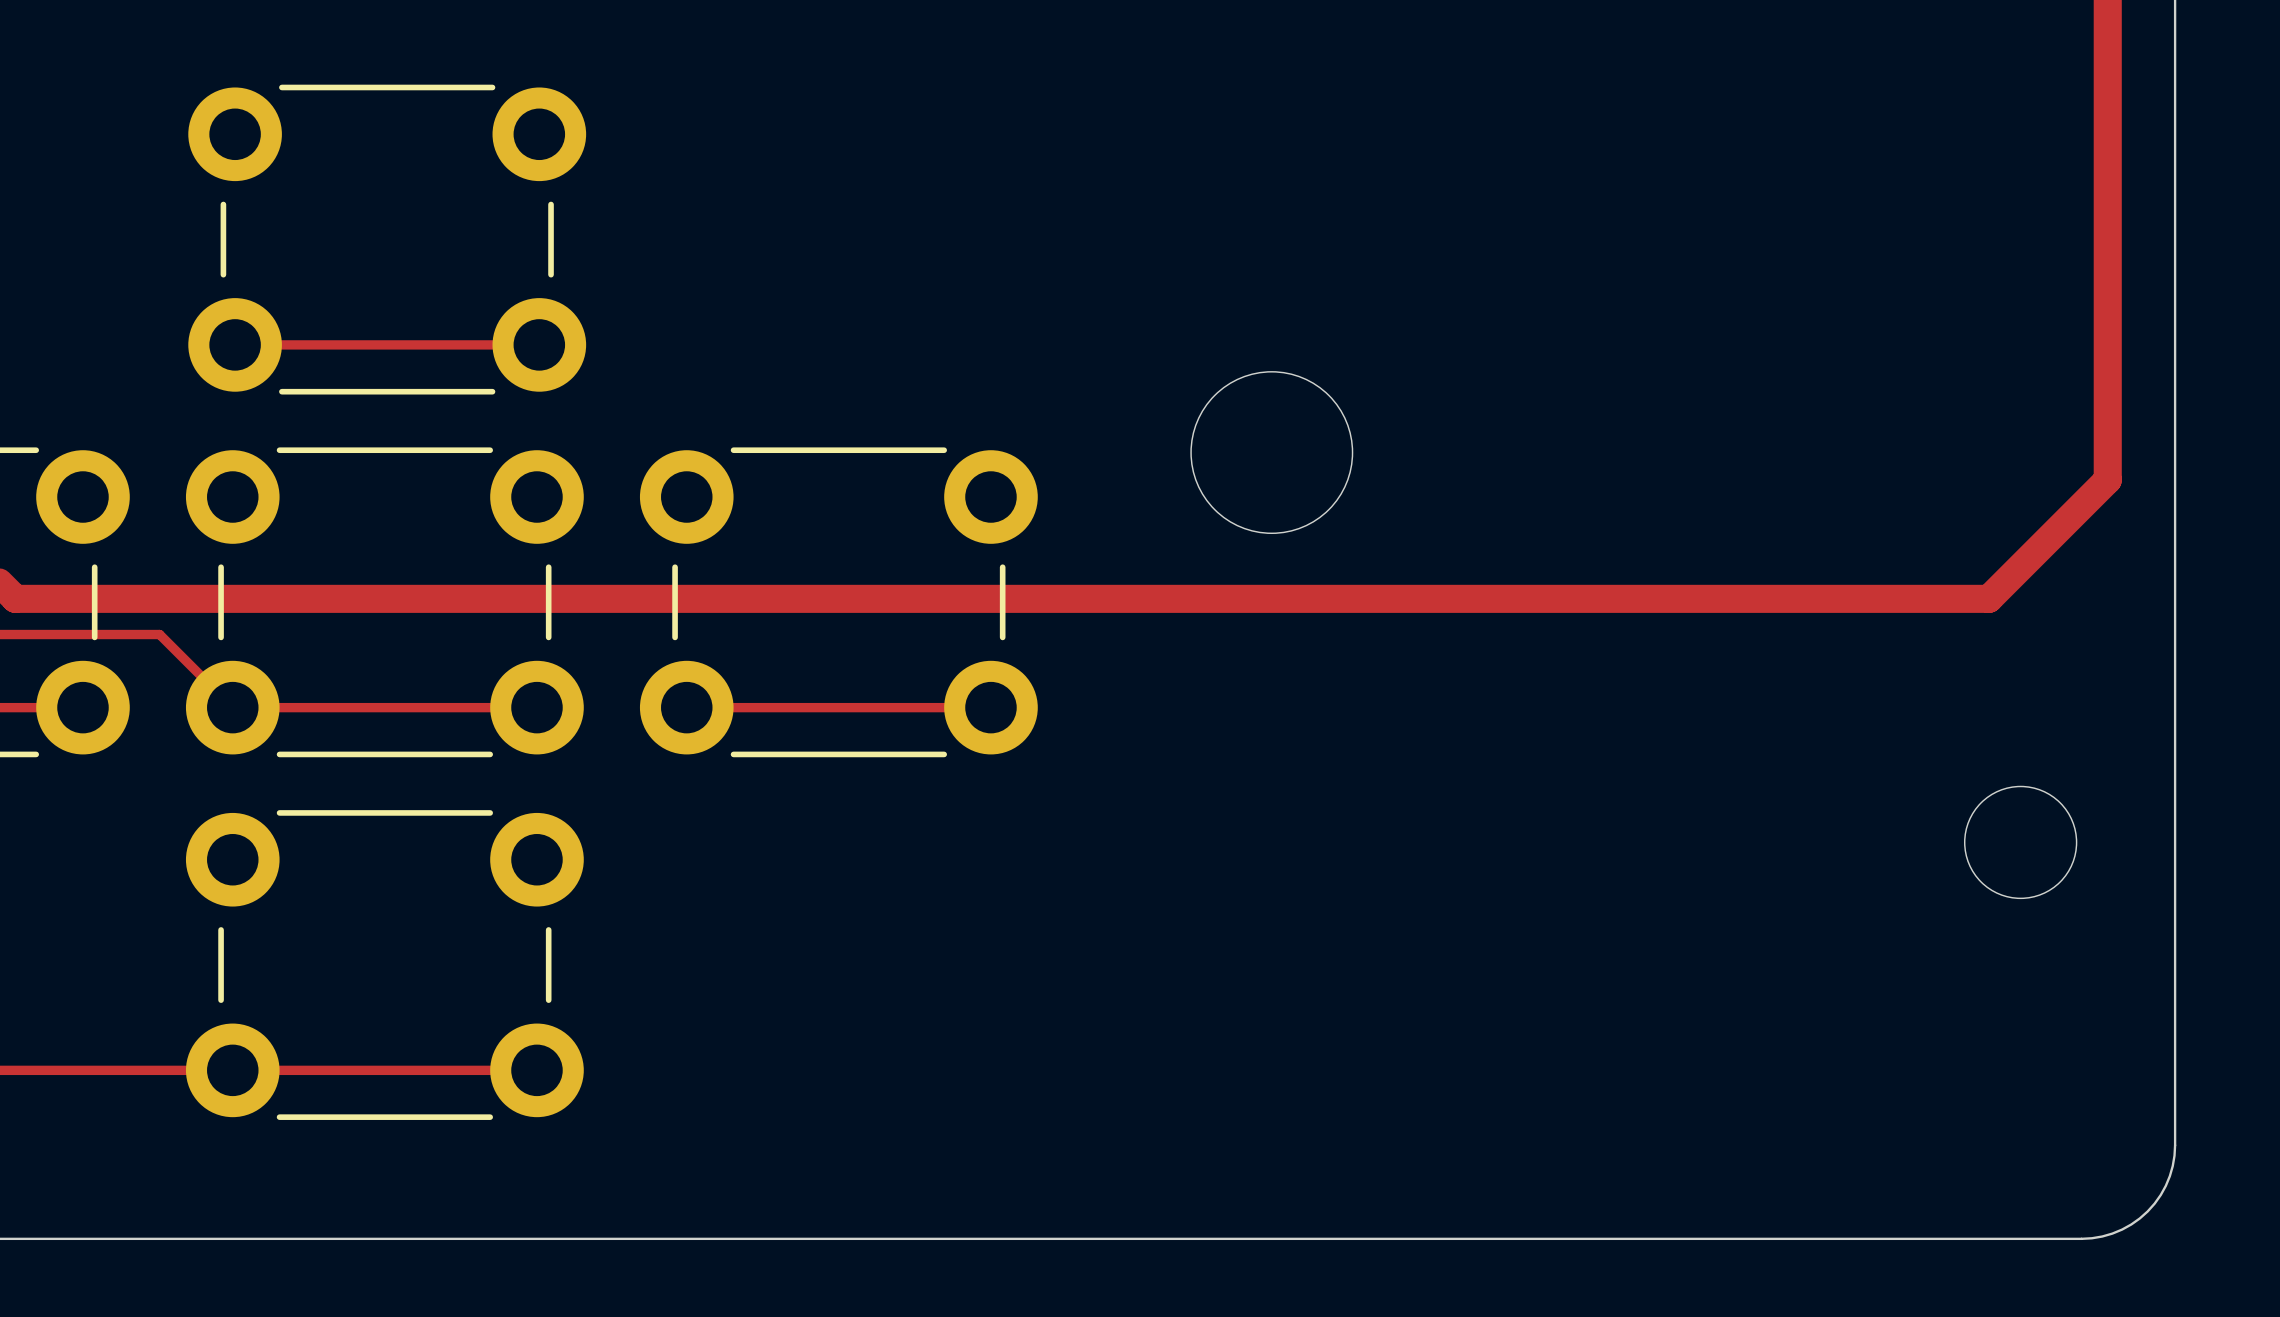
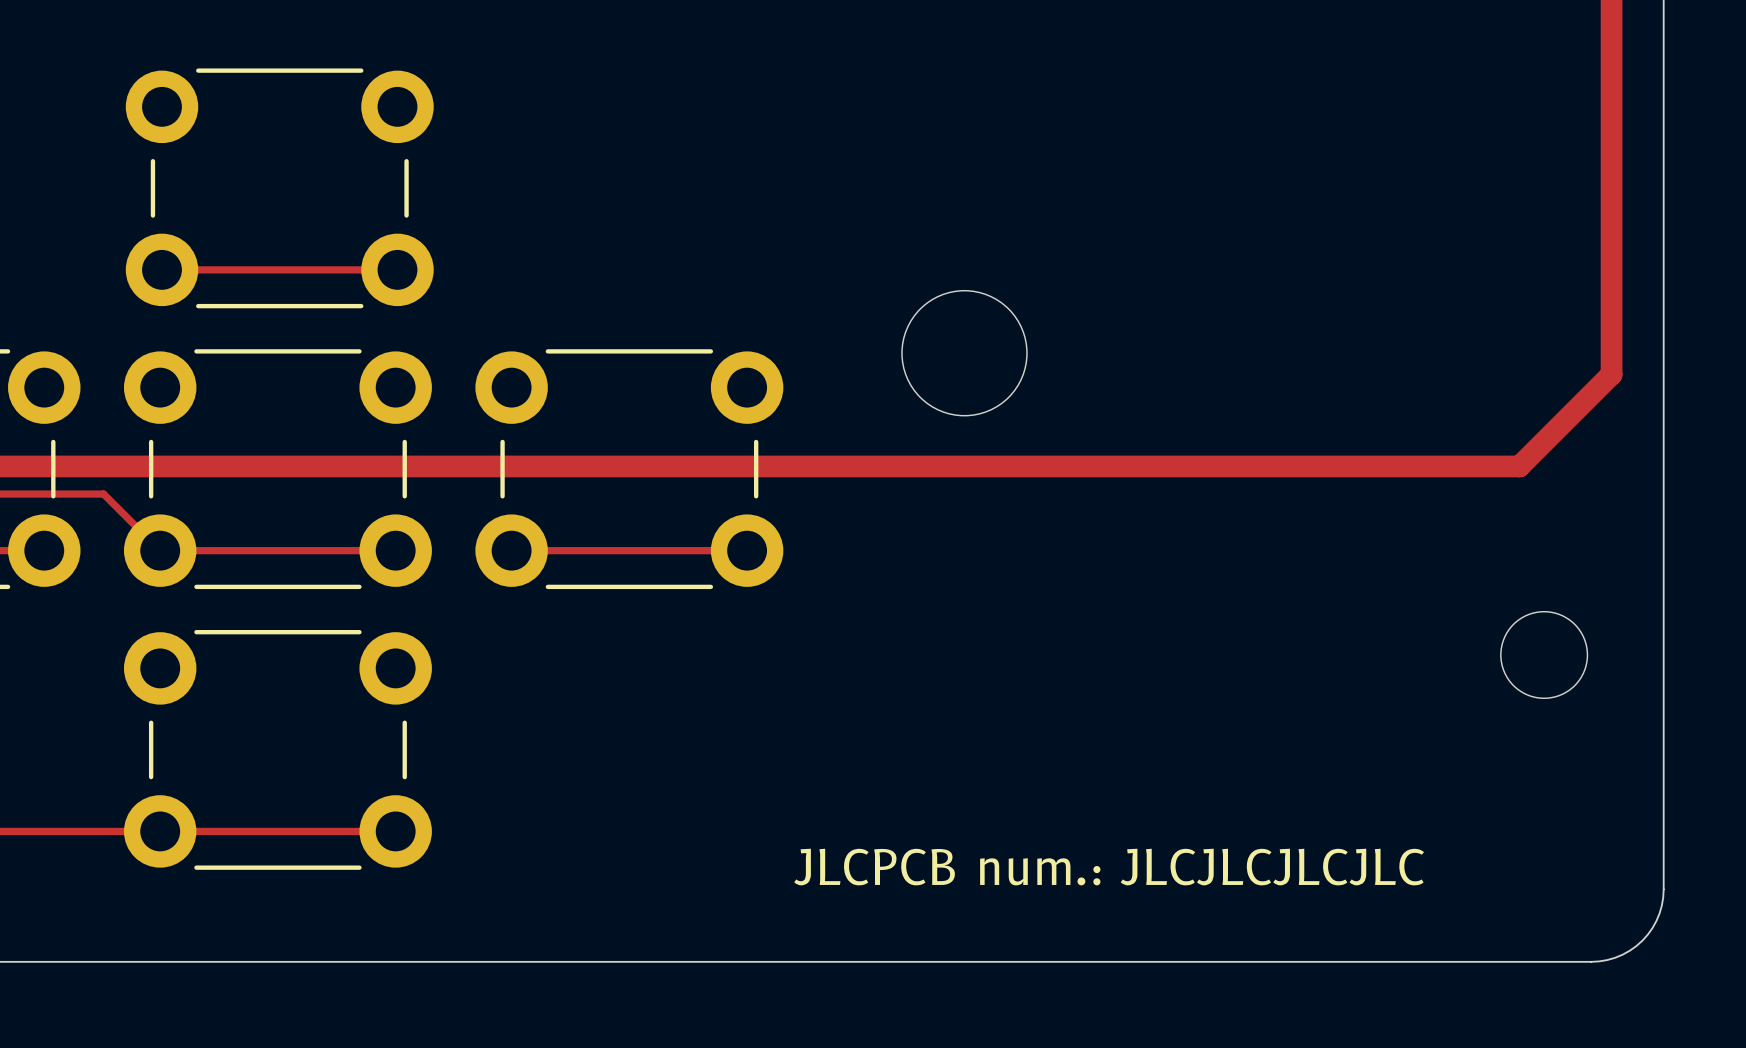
text: none -> JLCPCB num.: JLCJLCJLCJLC (1109, 867)

